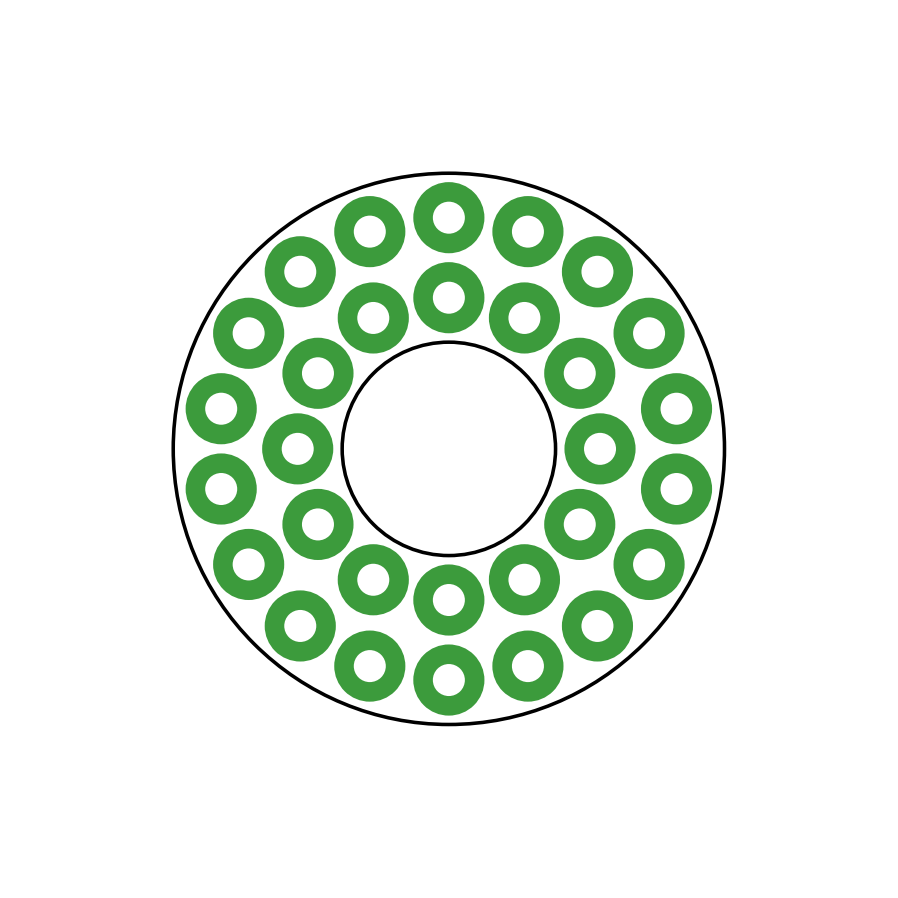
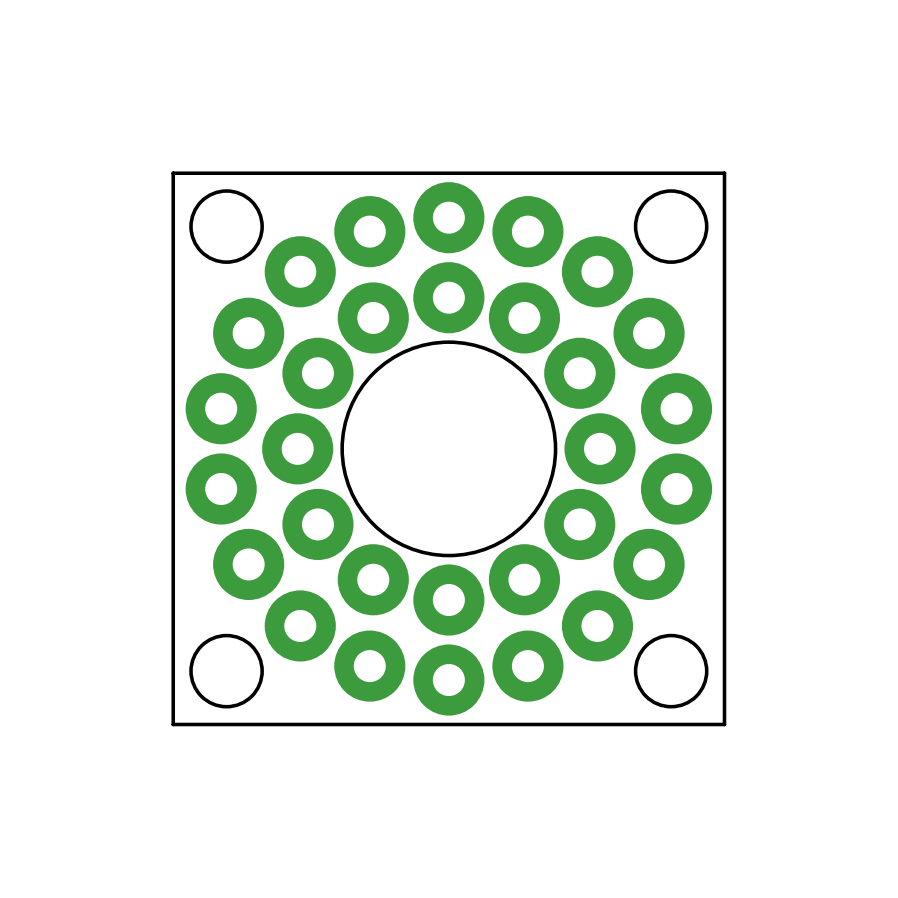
round board edge: [171, 171, 727, 727] -> none
board edge: none -> (173, 173) (173, 724) (724, 724) (724, 173) (173, 173)
round board edge: none -> [189, 189, 264, 264]
round board edge: none -> [633, 189, 709, 264]
round board edge: none -> [189, 633, 264, 709]
round board edge: none -> [633, 633, 709, 709]

